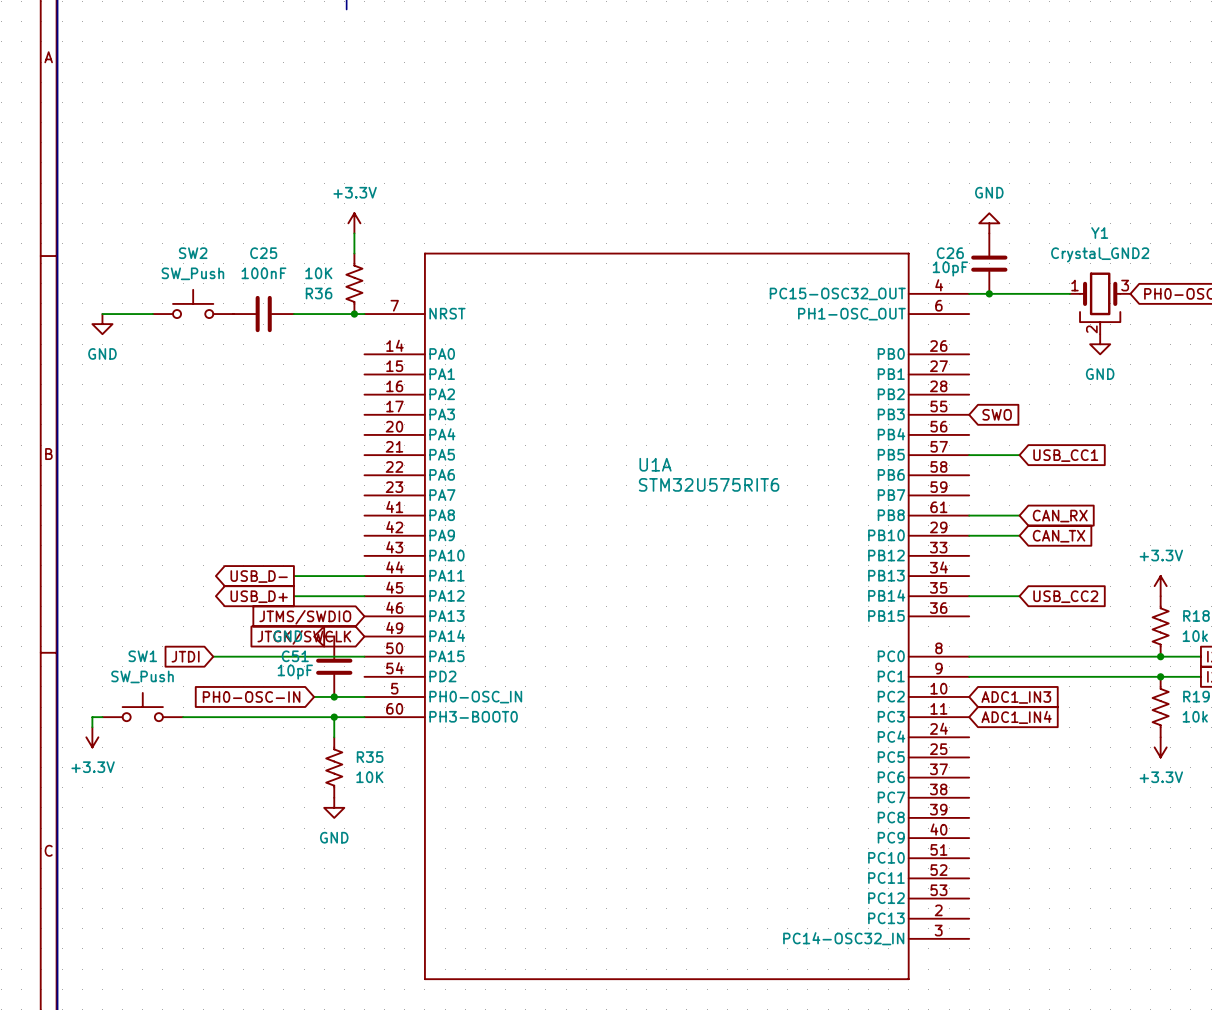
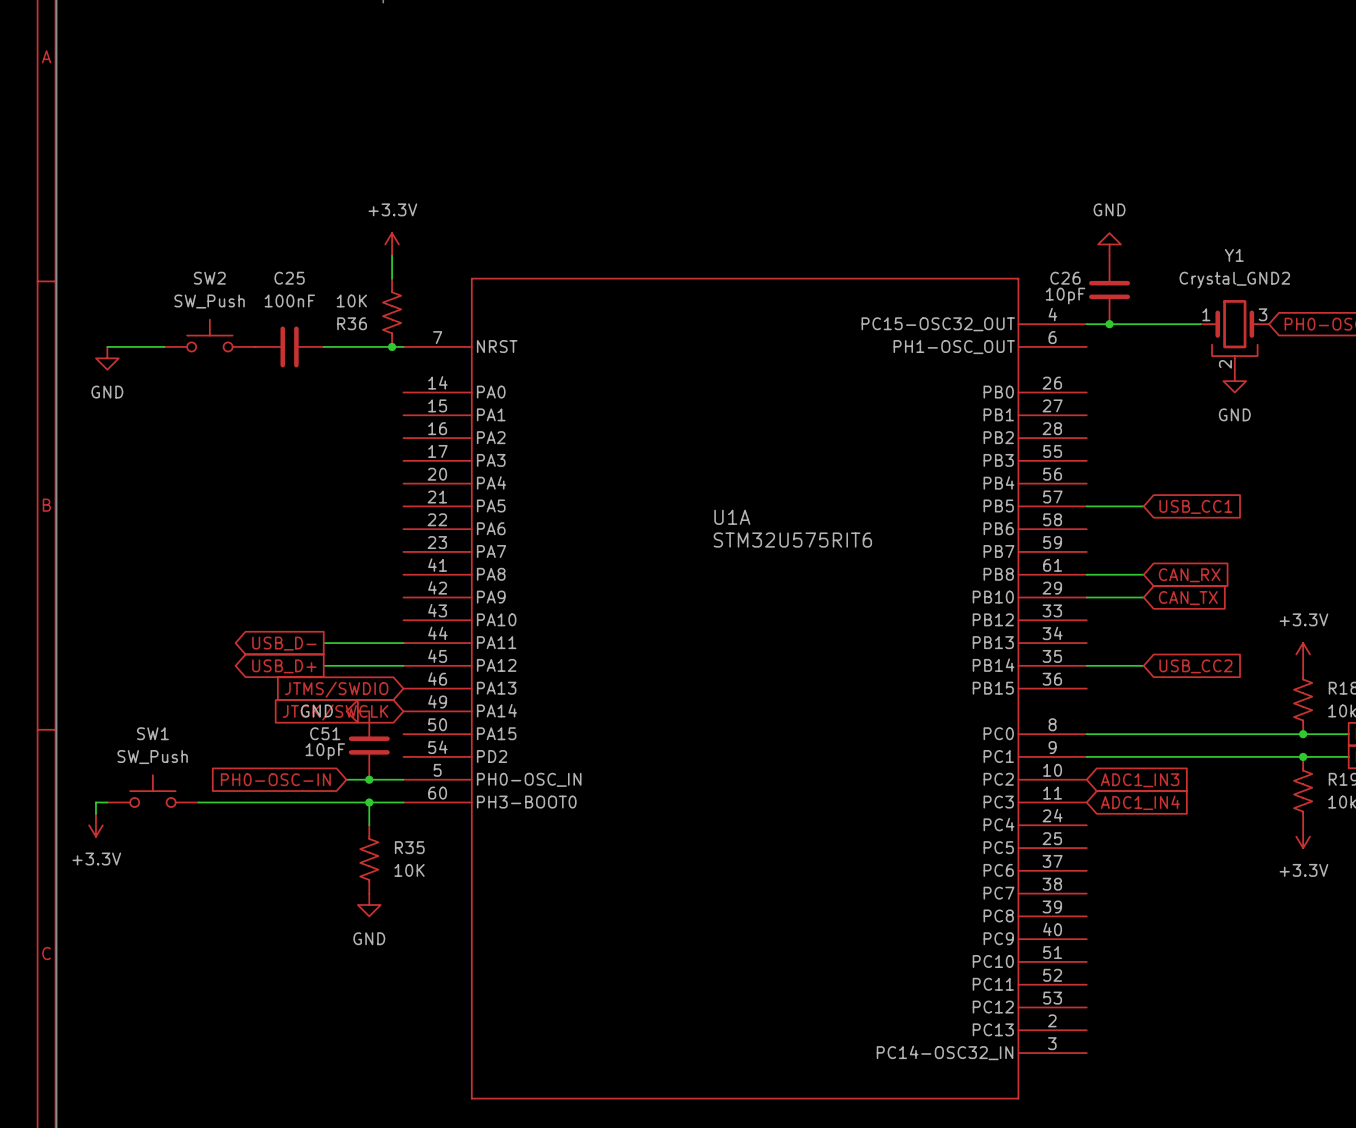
global label: SWO (997, 414) -> none
global label: JTDI (185, 656) -> none
wire: (213, 656) (364, 656) -> none

